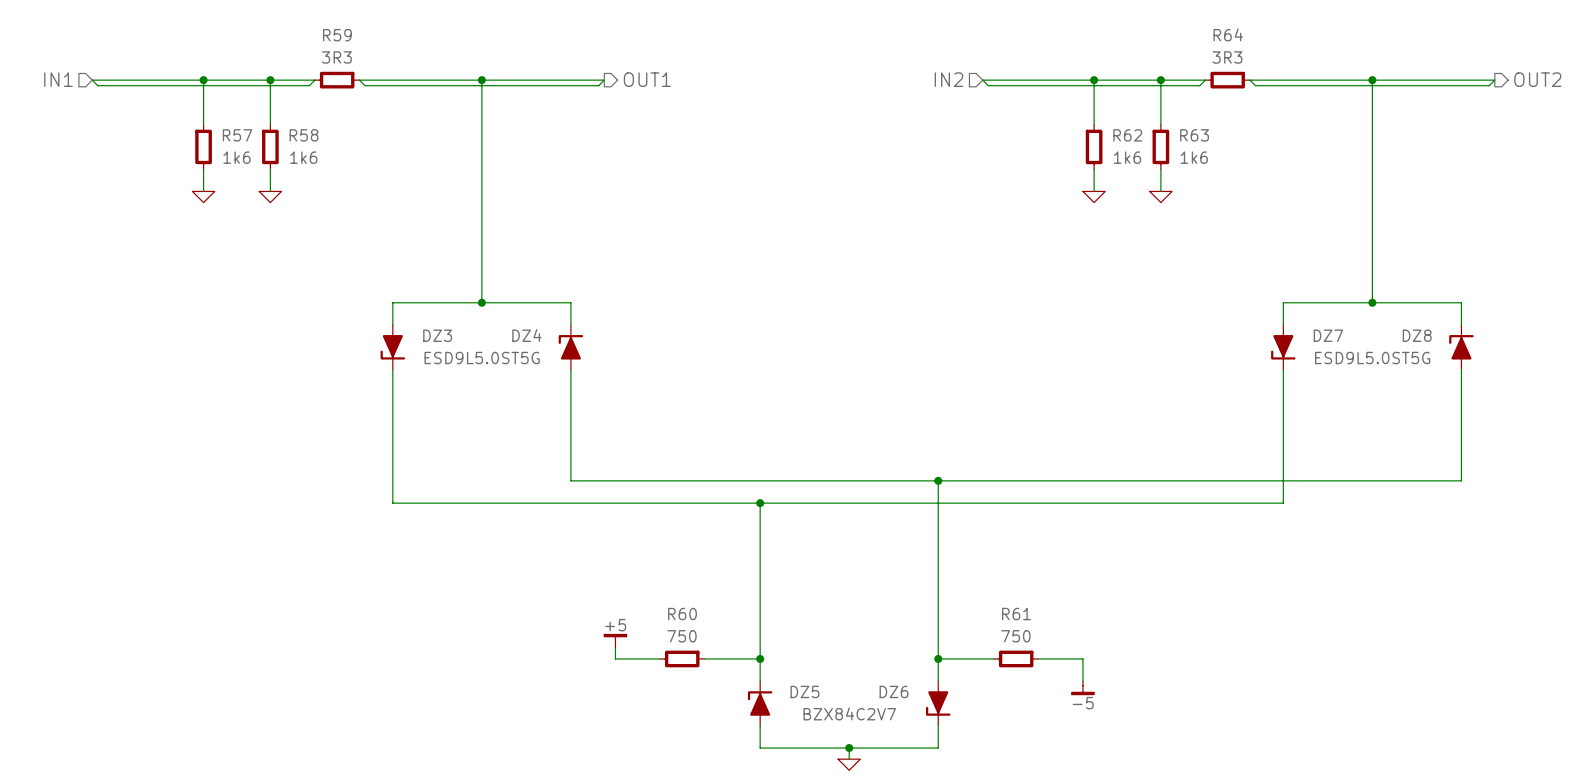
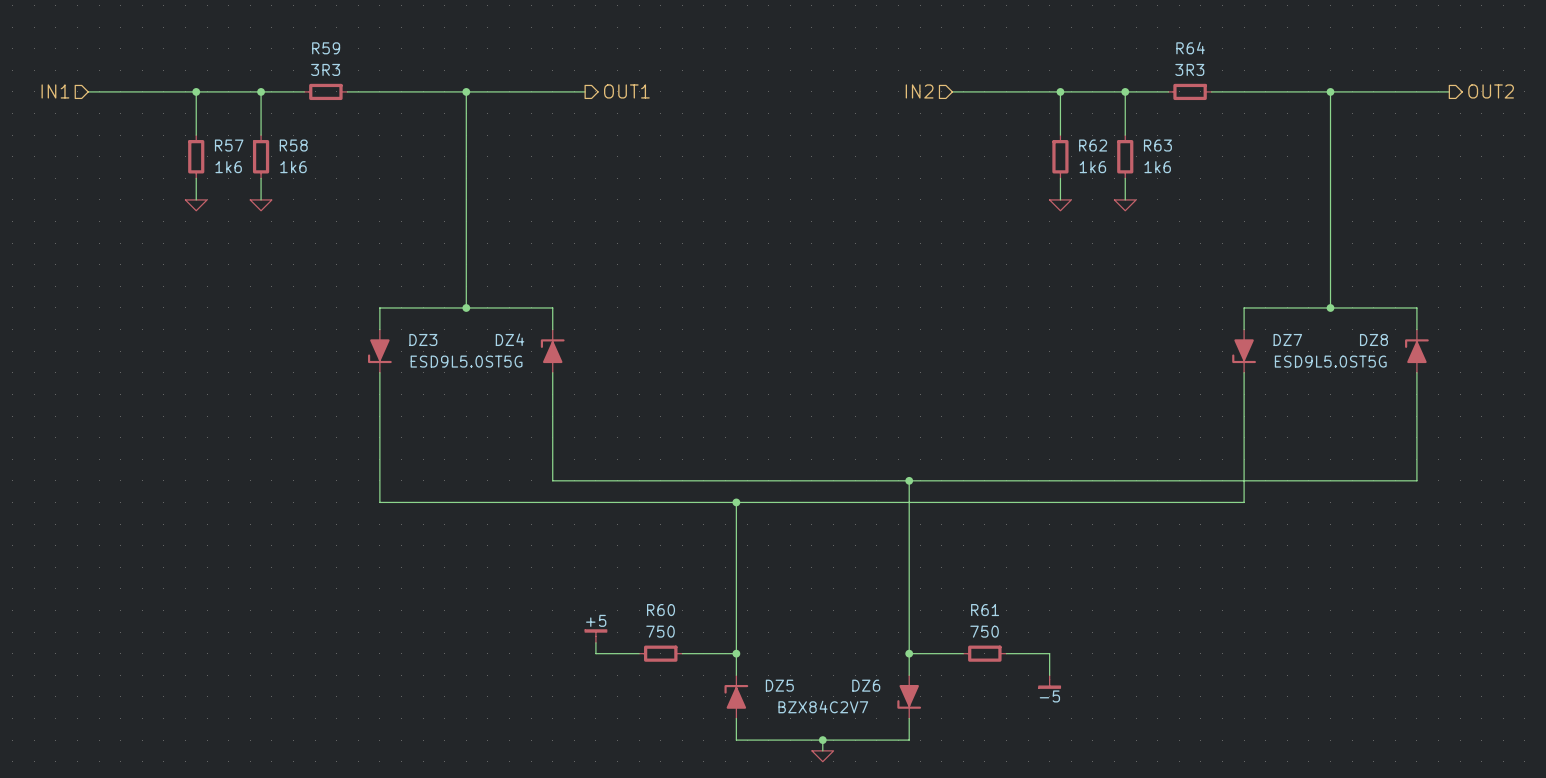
wire: (92, 80) (97, 85) (309, 85) (314, 80) -> none
wire: (359, 80) (364, 85) (598, 85) (604, 80) -> none
wire: (982, 80) (988, 85) (1199, 85) (1205, 80) -> none
wire: (1249, 80) (1255, 85) (1489, 85) (1494, 80) -> none

